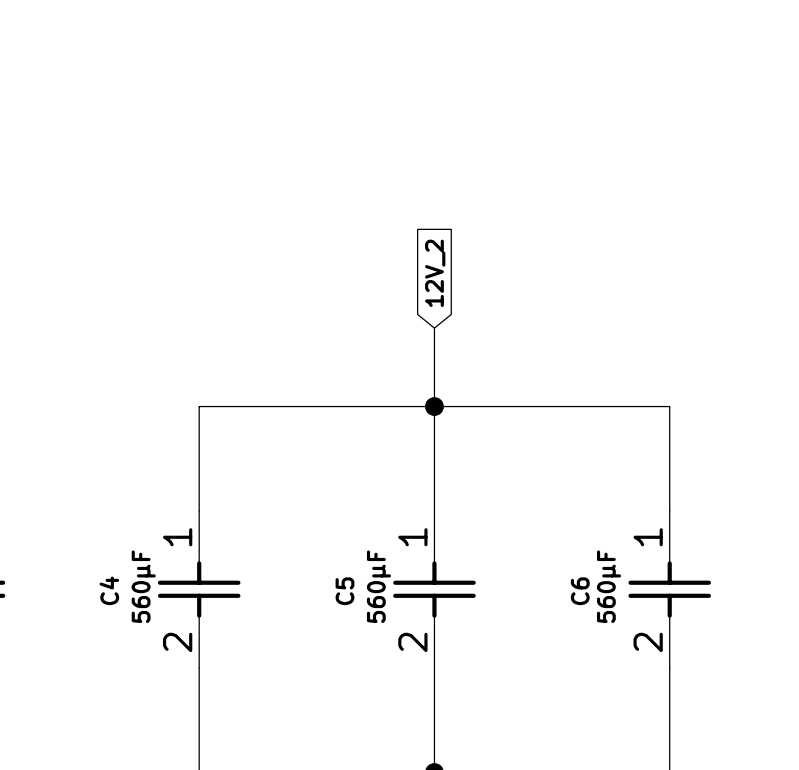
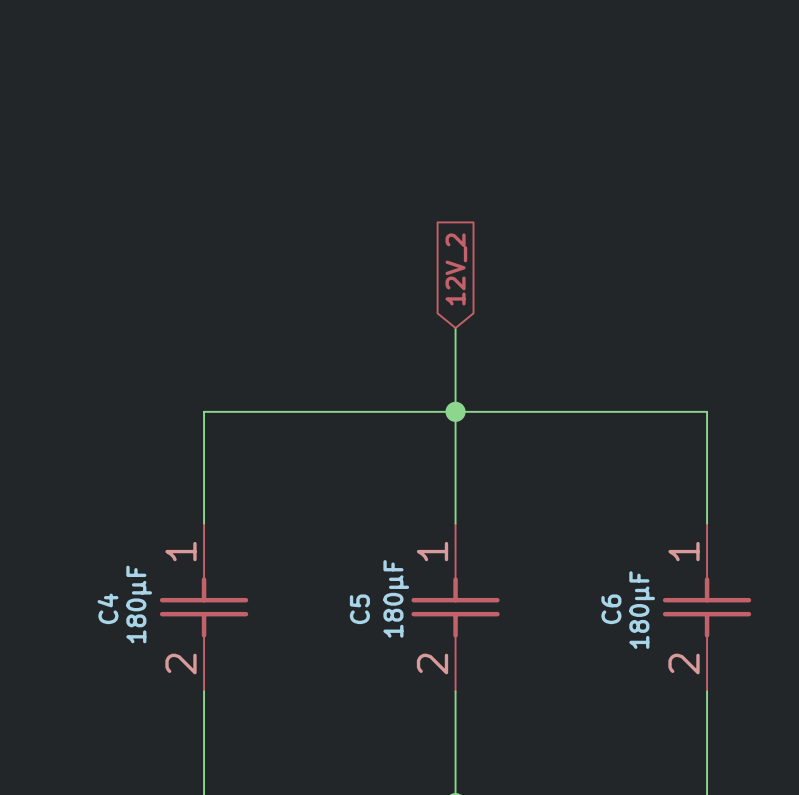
C4 value: 560μF (143, 586) -> 180μF (139, 604)
C5 value: 560μF (378, 586) -> 180μF (396, 598)
C6 value: 560μF (609, 586) -> 180μF (642, 610)

